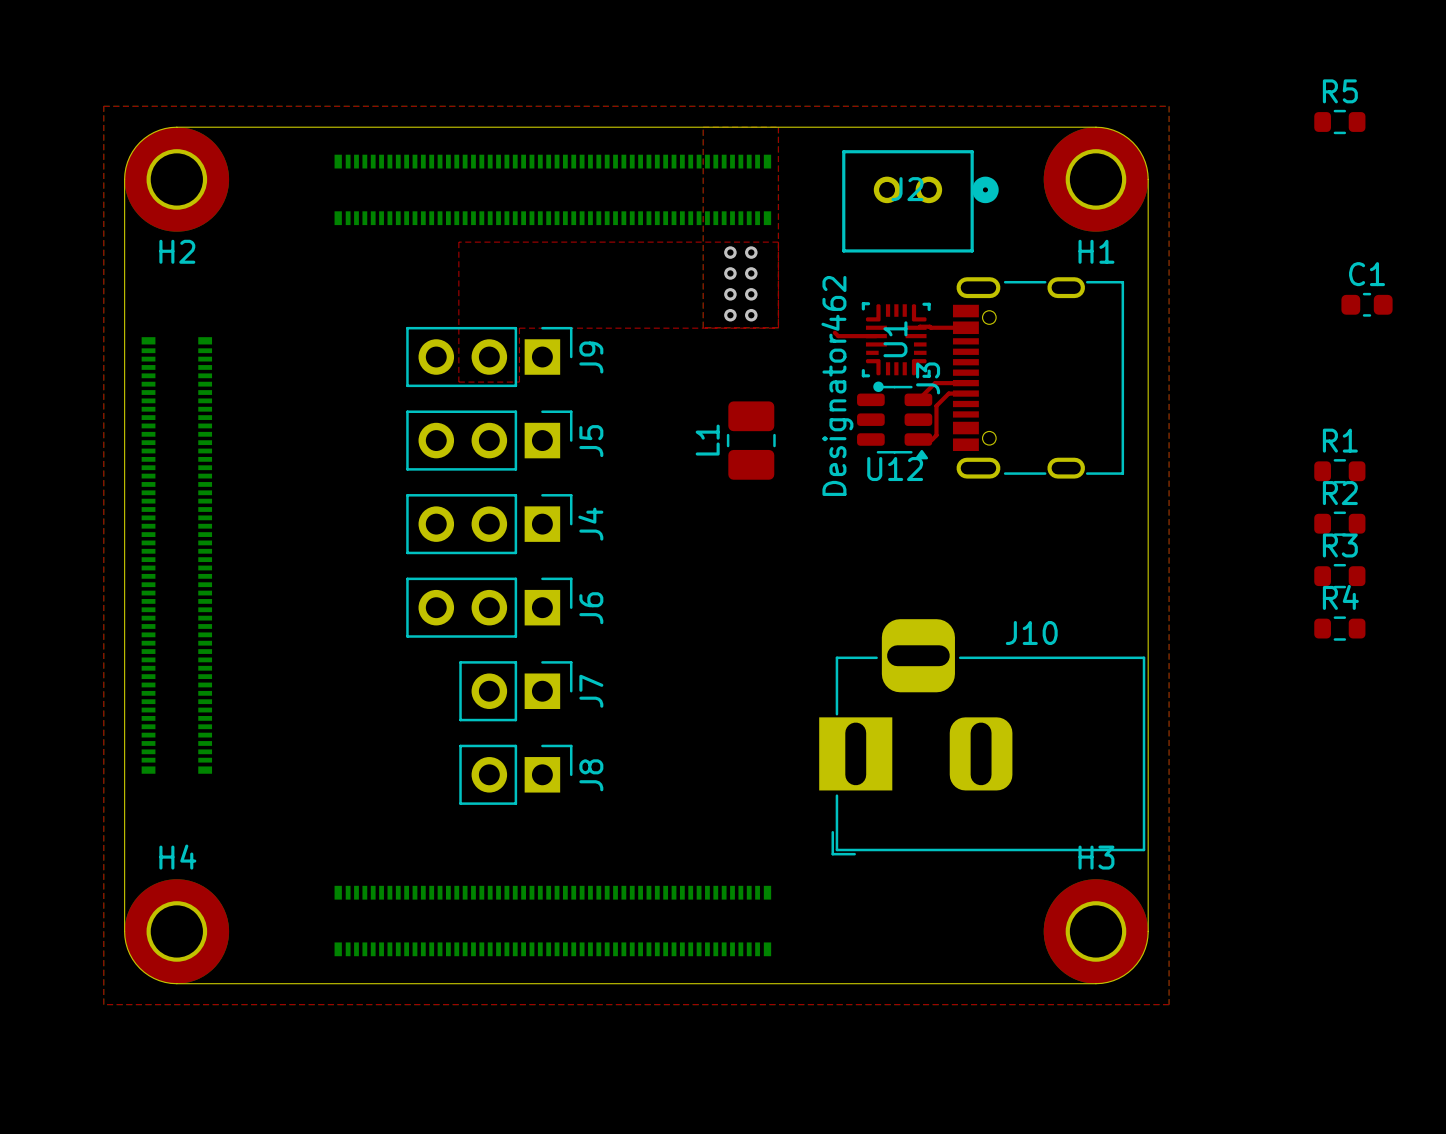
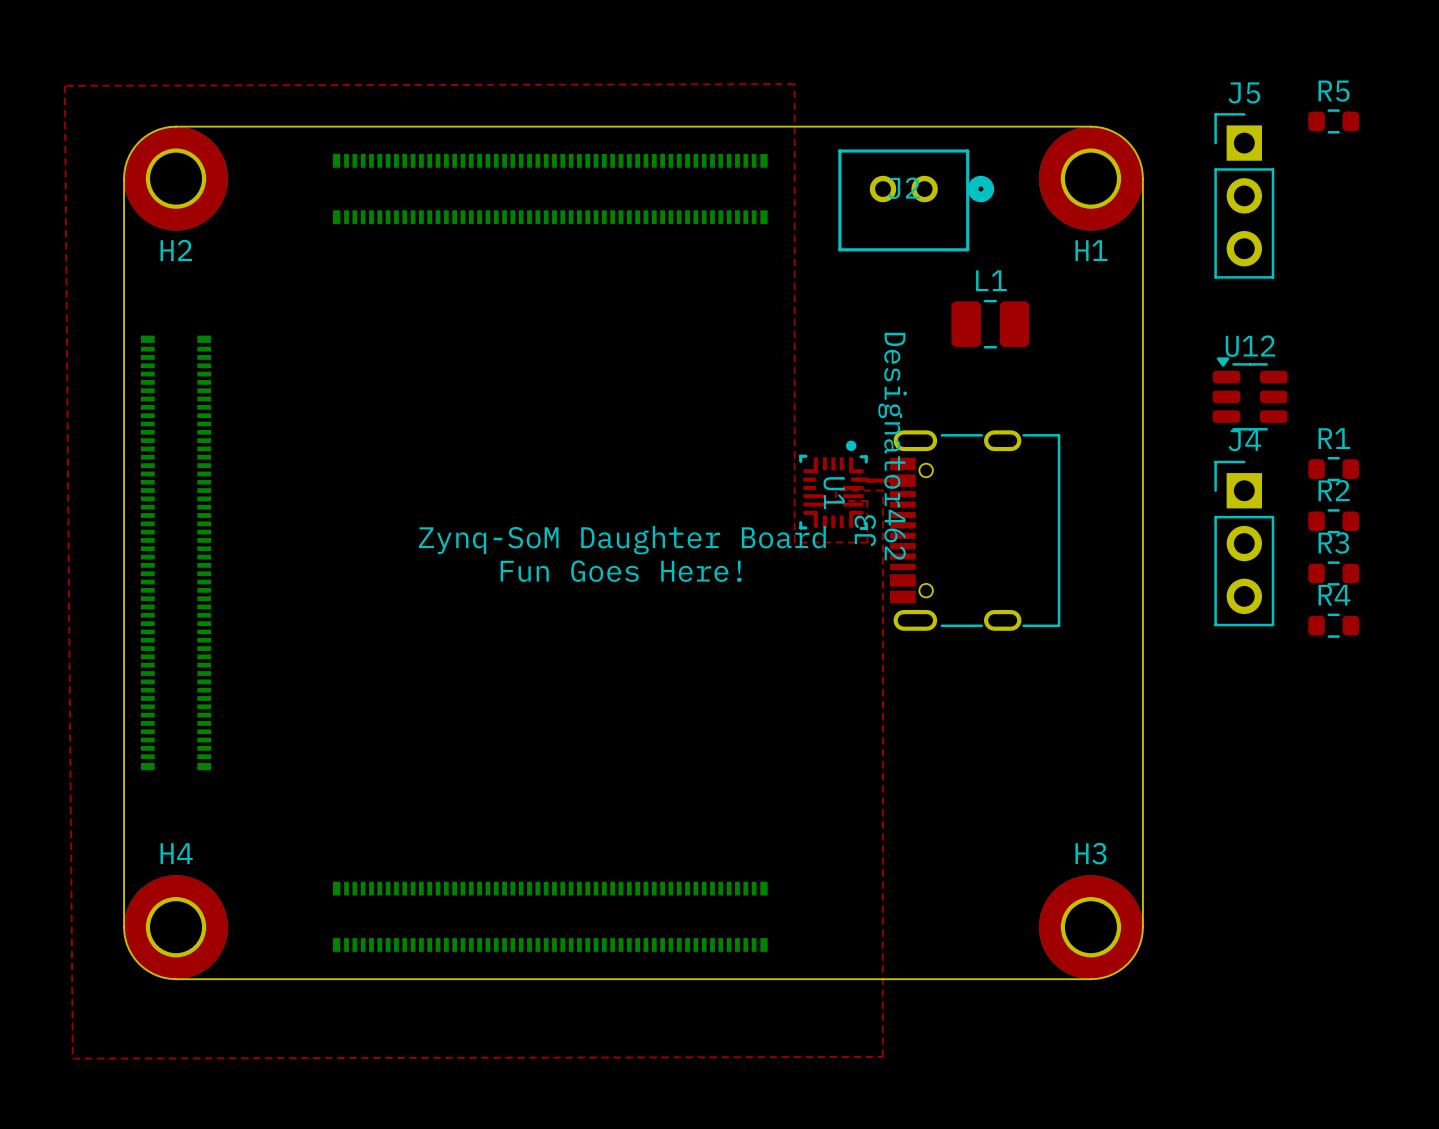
top zone outline: (103, 106) (1169, 106) (1169, 1004) (103, 1004) (103, 106) -> (794, 84) (64, 85) (72, 1058) (882, 1056) (883, 490) (836, 490) (836, 500) (867, 500) (867, 542) (794, 542) (794, 84)
top zone outline: (778, 242) (458, 242) (458, 382) (519, 382) (519, 328) (778, 328) (778, 127) (703, 127) (703, 327) (778, 327) -> none
via: (730, 252) -> none
via: (751, 252) -> none
via: (730, 273) -> none
via: (751, 273) -> none
via: (730, 294) -> none
via: (751, 294) -> none
C1: (1367, 304) -> none
via: (730, 315) -> none
via: (751, 315) -> none
top track: (920, 326) (965, 327) -> (857, 479) (902, 480)
top track: (834, 332) (838, 336) (876, 336) -> none
U1 rotation: 0° (896, 347) -> 180° (833, 485)
U1 position: (896, 347) -> (833, 485)
J9: (489, 357) -> none
J3 position: (1038, 377) -> (975, 530)
top track: (965, 383) (935, 383) (918, 399) -> none
top track: (965, 393) (948, 393) (936, 405) (936, 435) (932, 439) (918, 439) -> none
U12 rotation: 0° (894, 422) -> 180° (1250, 393)
U12 position: (894, 422) -> (1250, 393)
J5 rotation: 0° (489, 440) -> 90° counterclockwise (1244, 195)
J5 position: (489, 440) -> (1244, 195)
L1 rotation: 0° (751, 440) -> 90° clockwise (990, 324)
L1 position: (751, 440) -> (990, 324)
J4 rotation: 0° (489, 524) -> 90° counterclockwise (1244, 543)
J4 position: (489, 524) -> (1244, 543)
text: none -> Zynq-SoM Daughter Board (622, 540)
text: none -> Fun Goes Here! (621, 571)
J6: (489, 607) -> none
J7: (515, 691) -> none
J10: (982, 737) -> none
J8: (515, 774) -> none

